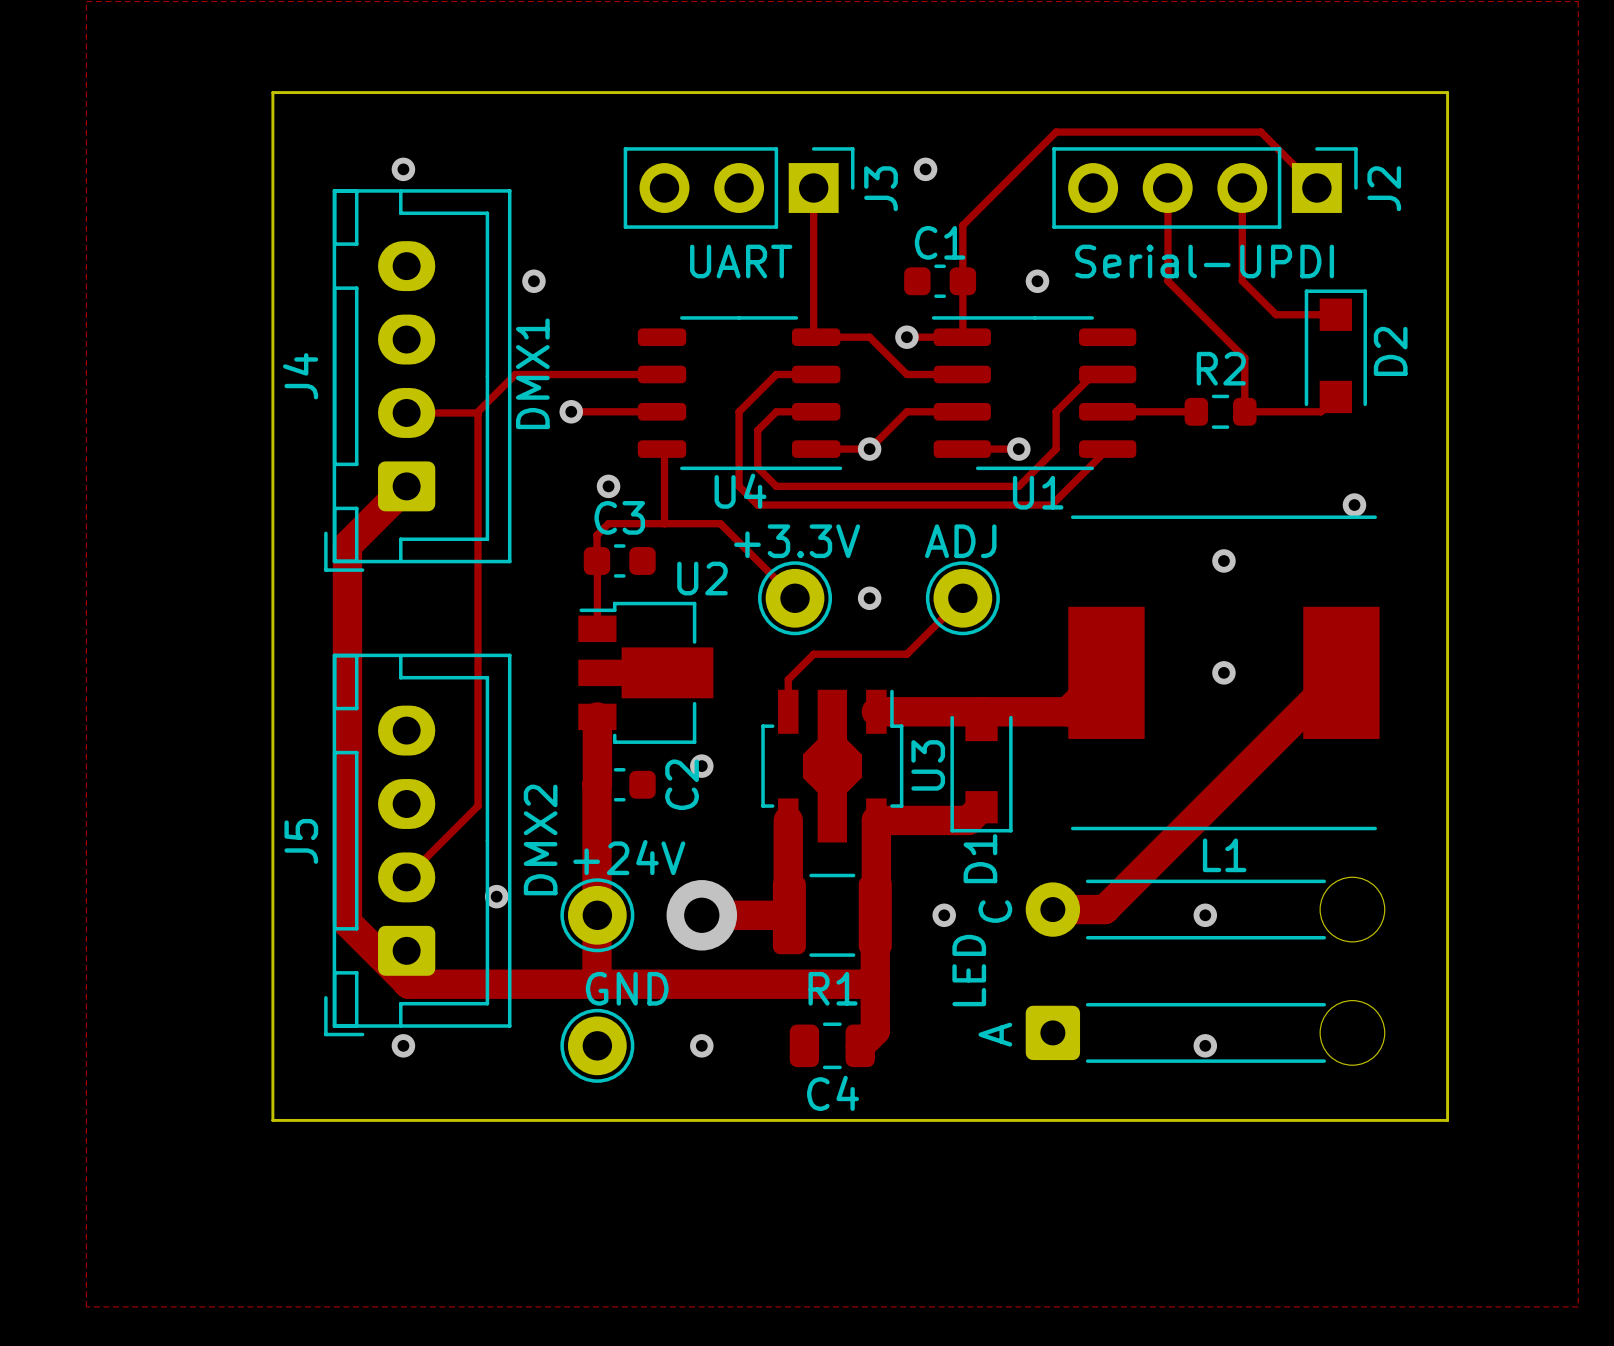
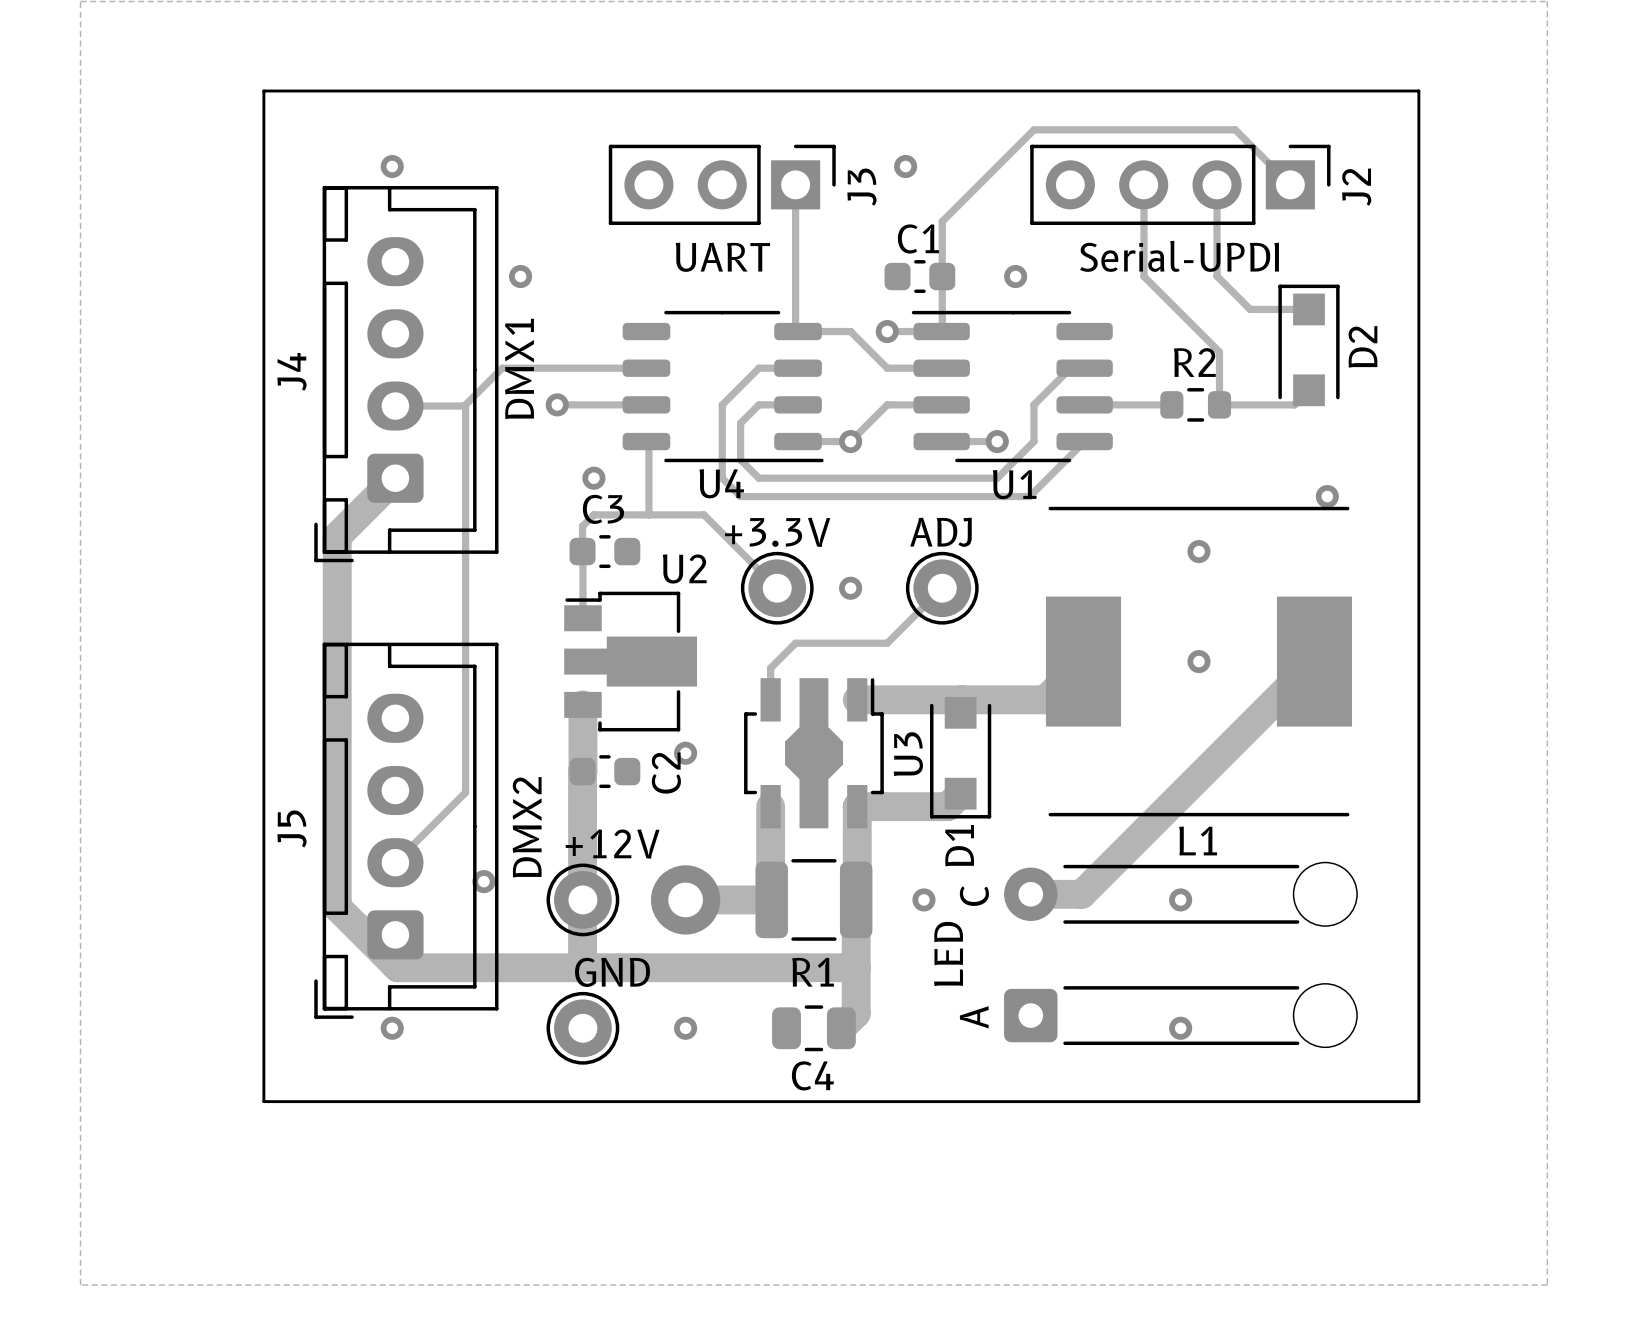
part value: +24V (629, 857) -> +12V (612, 844)

